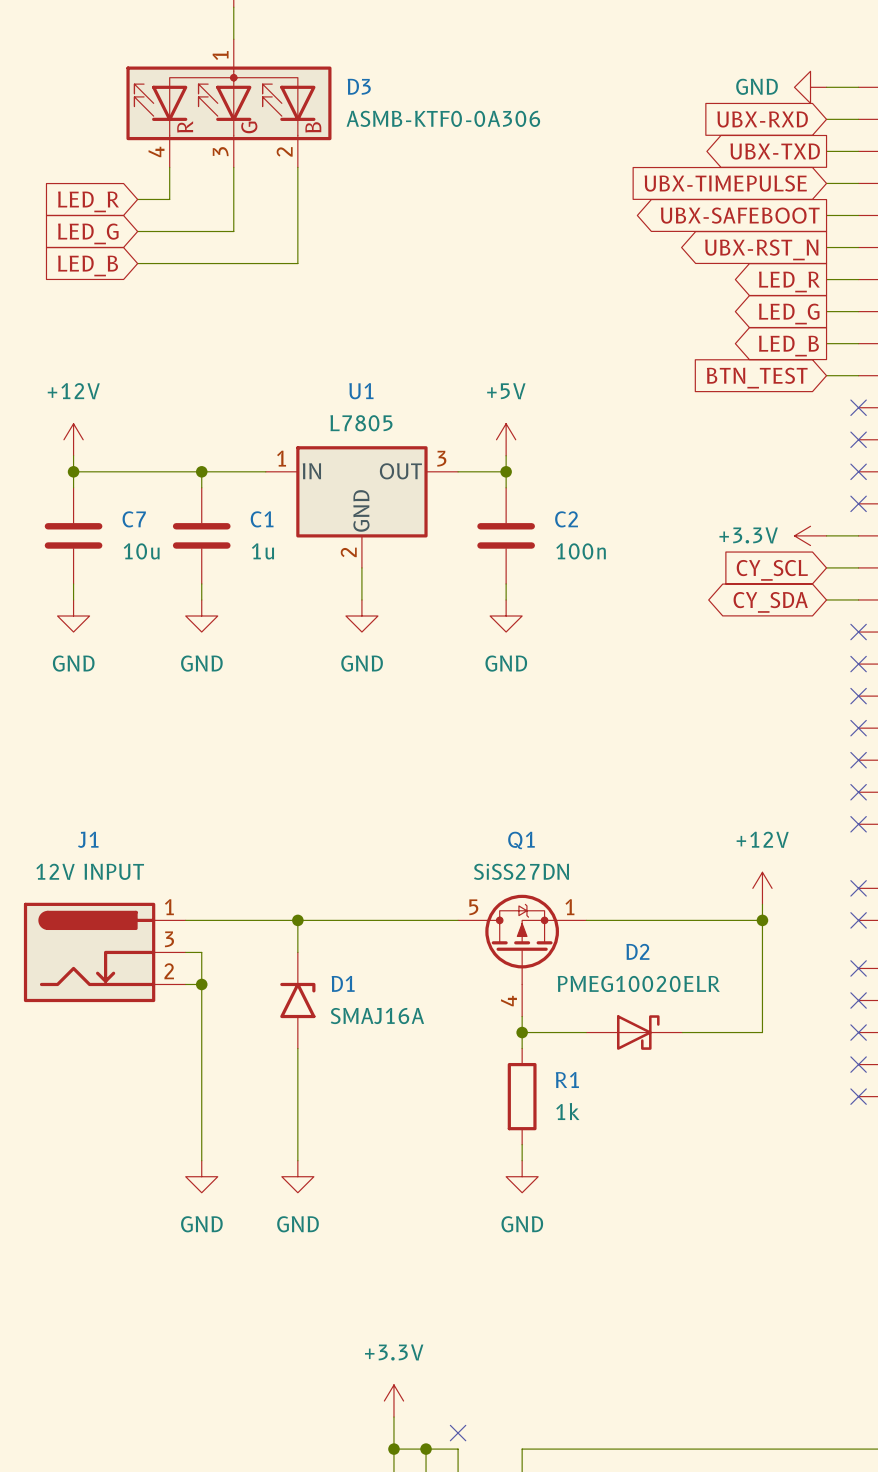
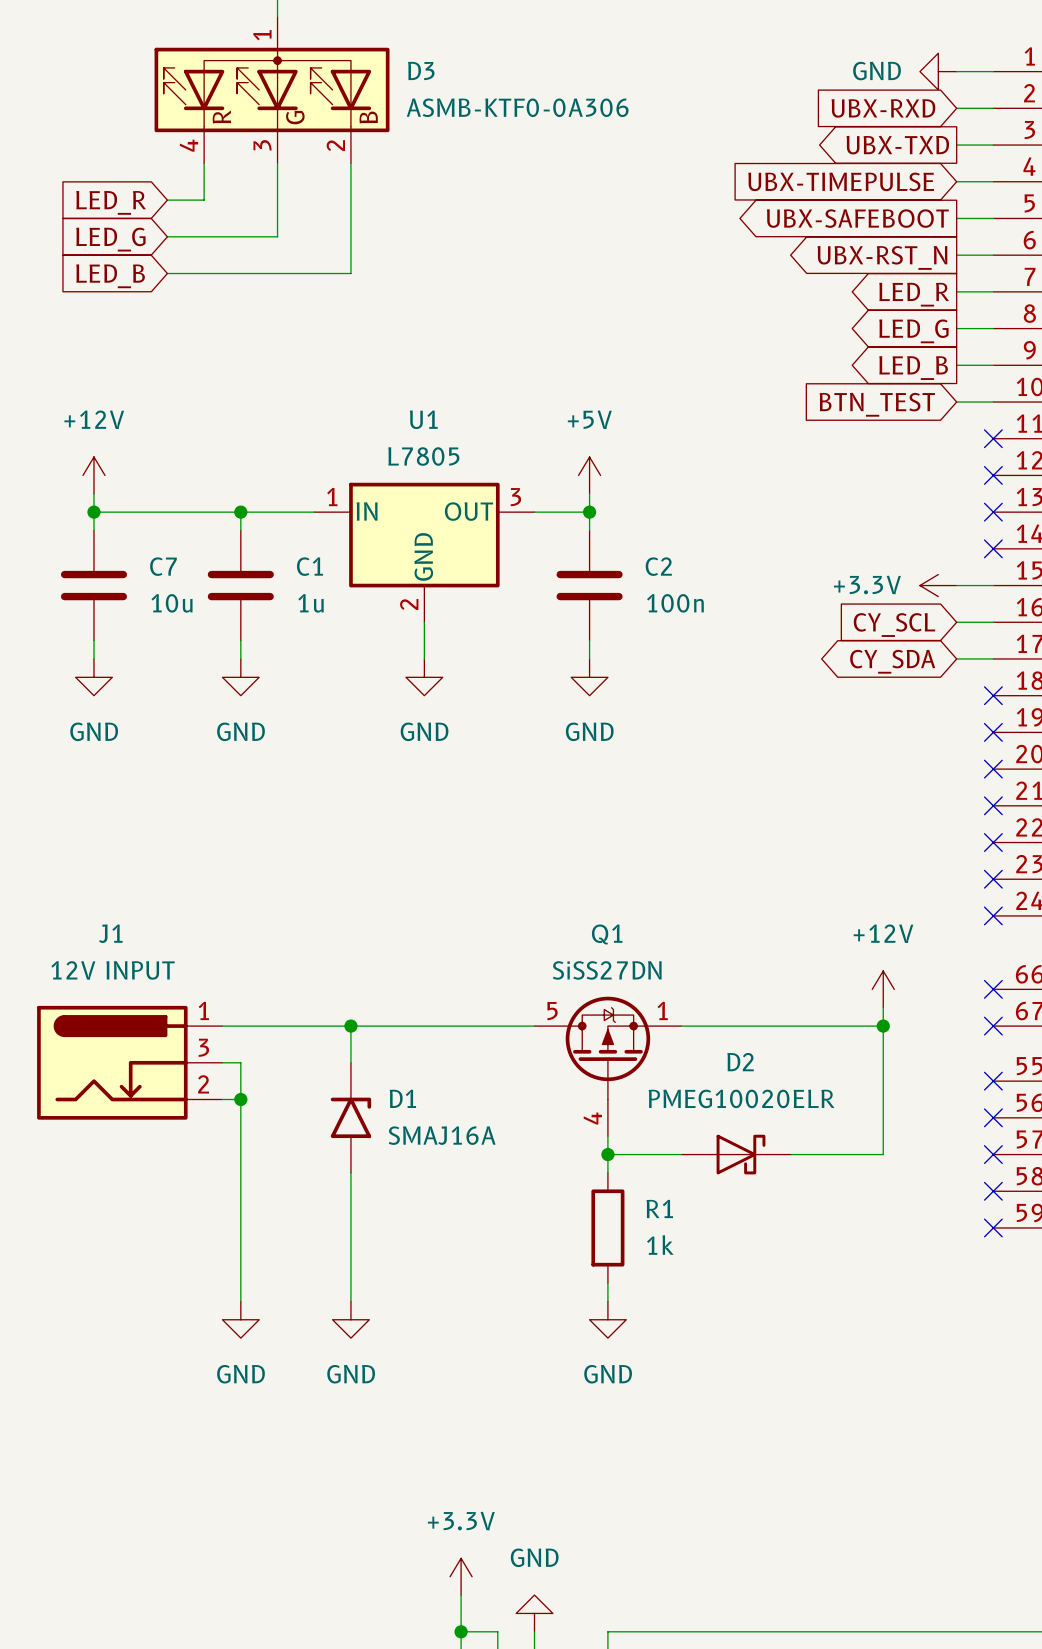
no-connect mark: (458, 1433) -> none
power symbol: none -> GND (534, 1613)
wire: (426, 1449) (458, 1449) -> none
junction: (426, 1449) -> none

